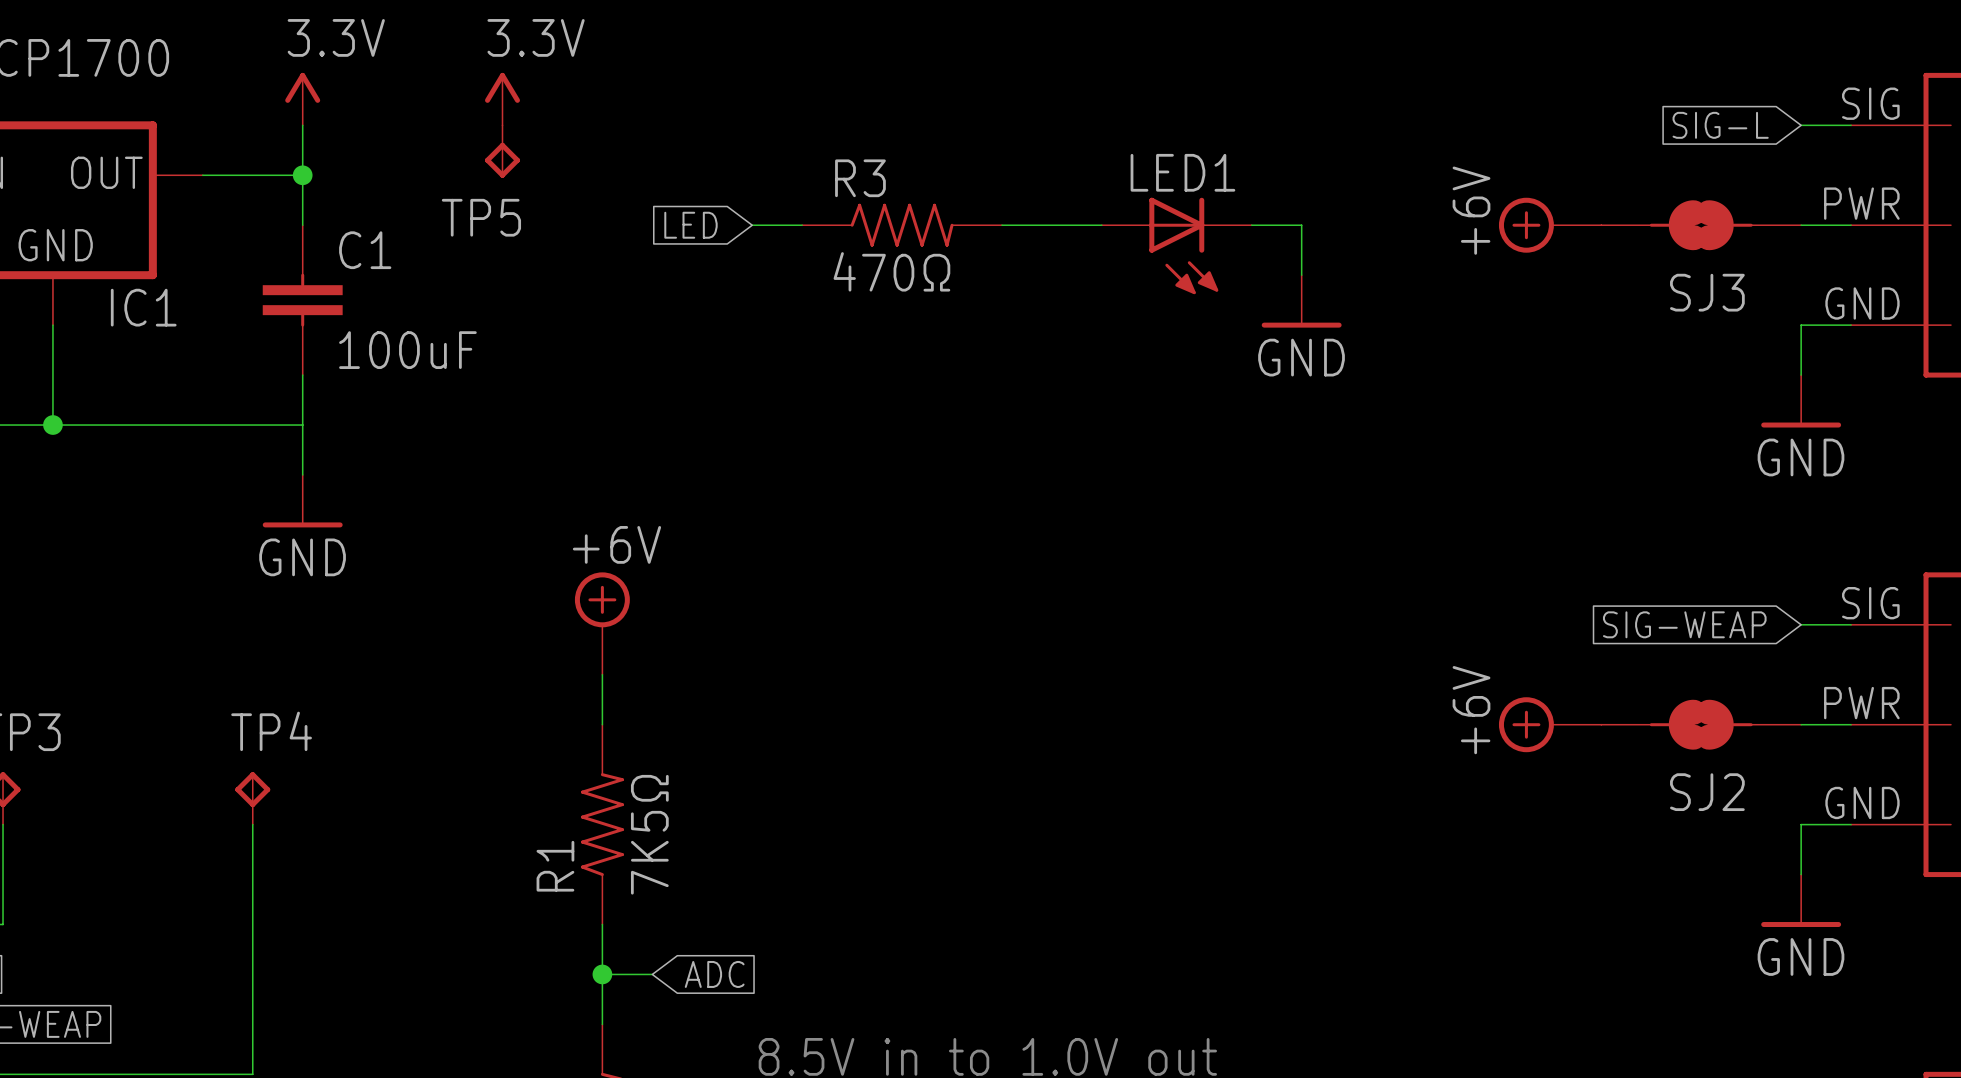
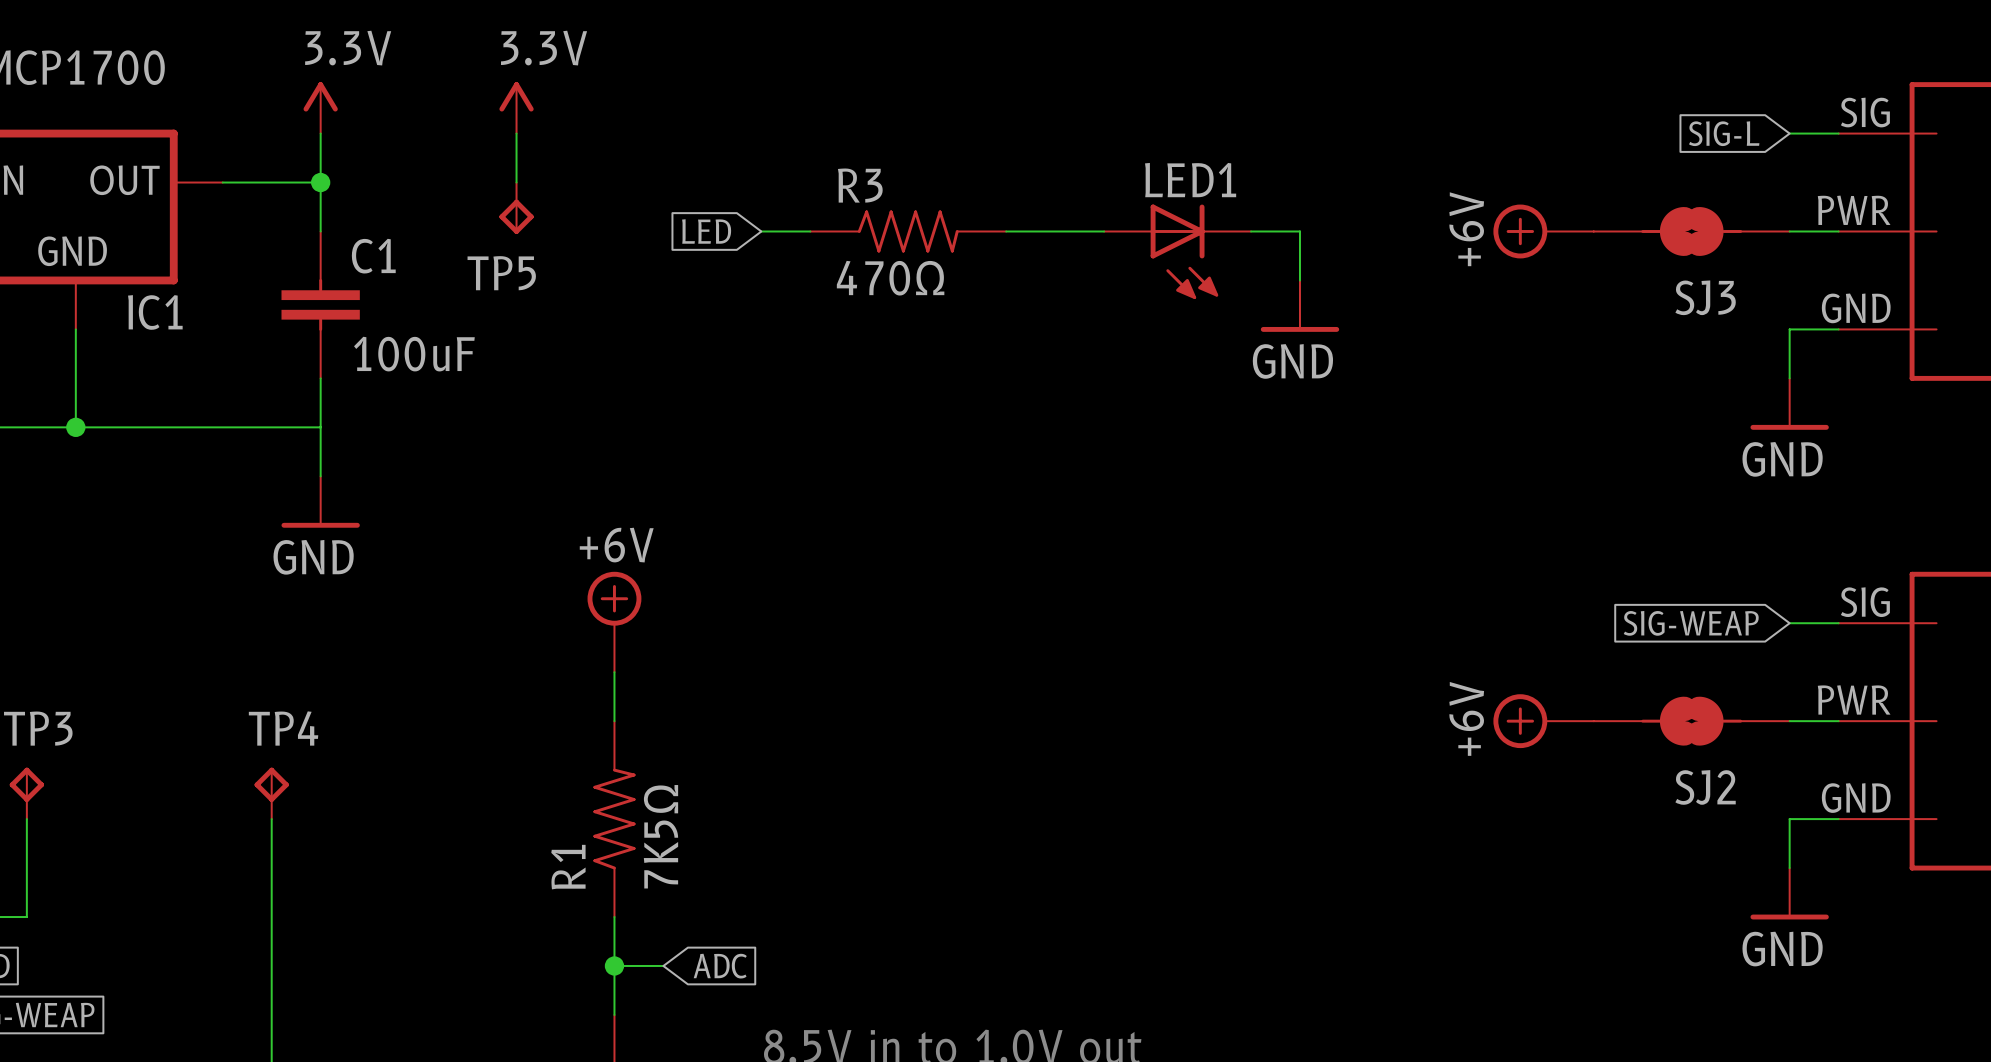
TP5 position: (502, 151) -> (516, 208)

